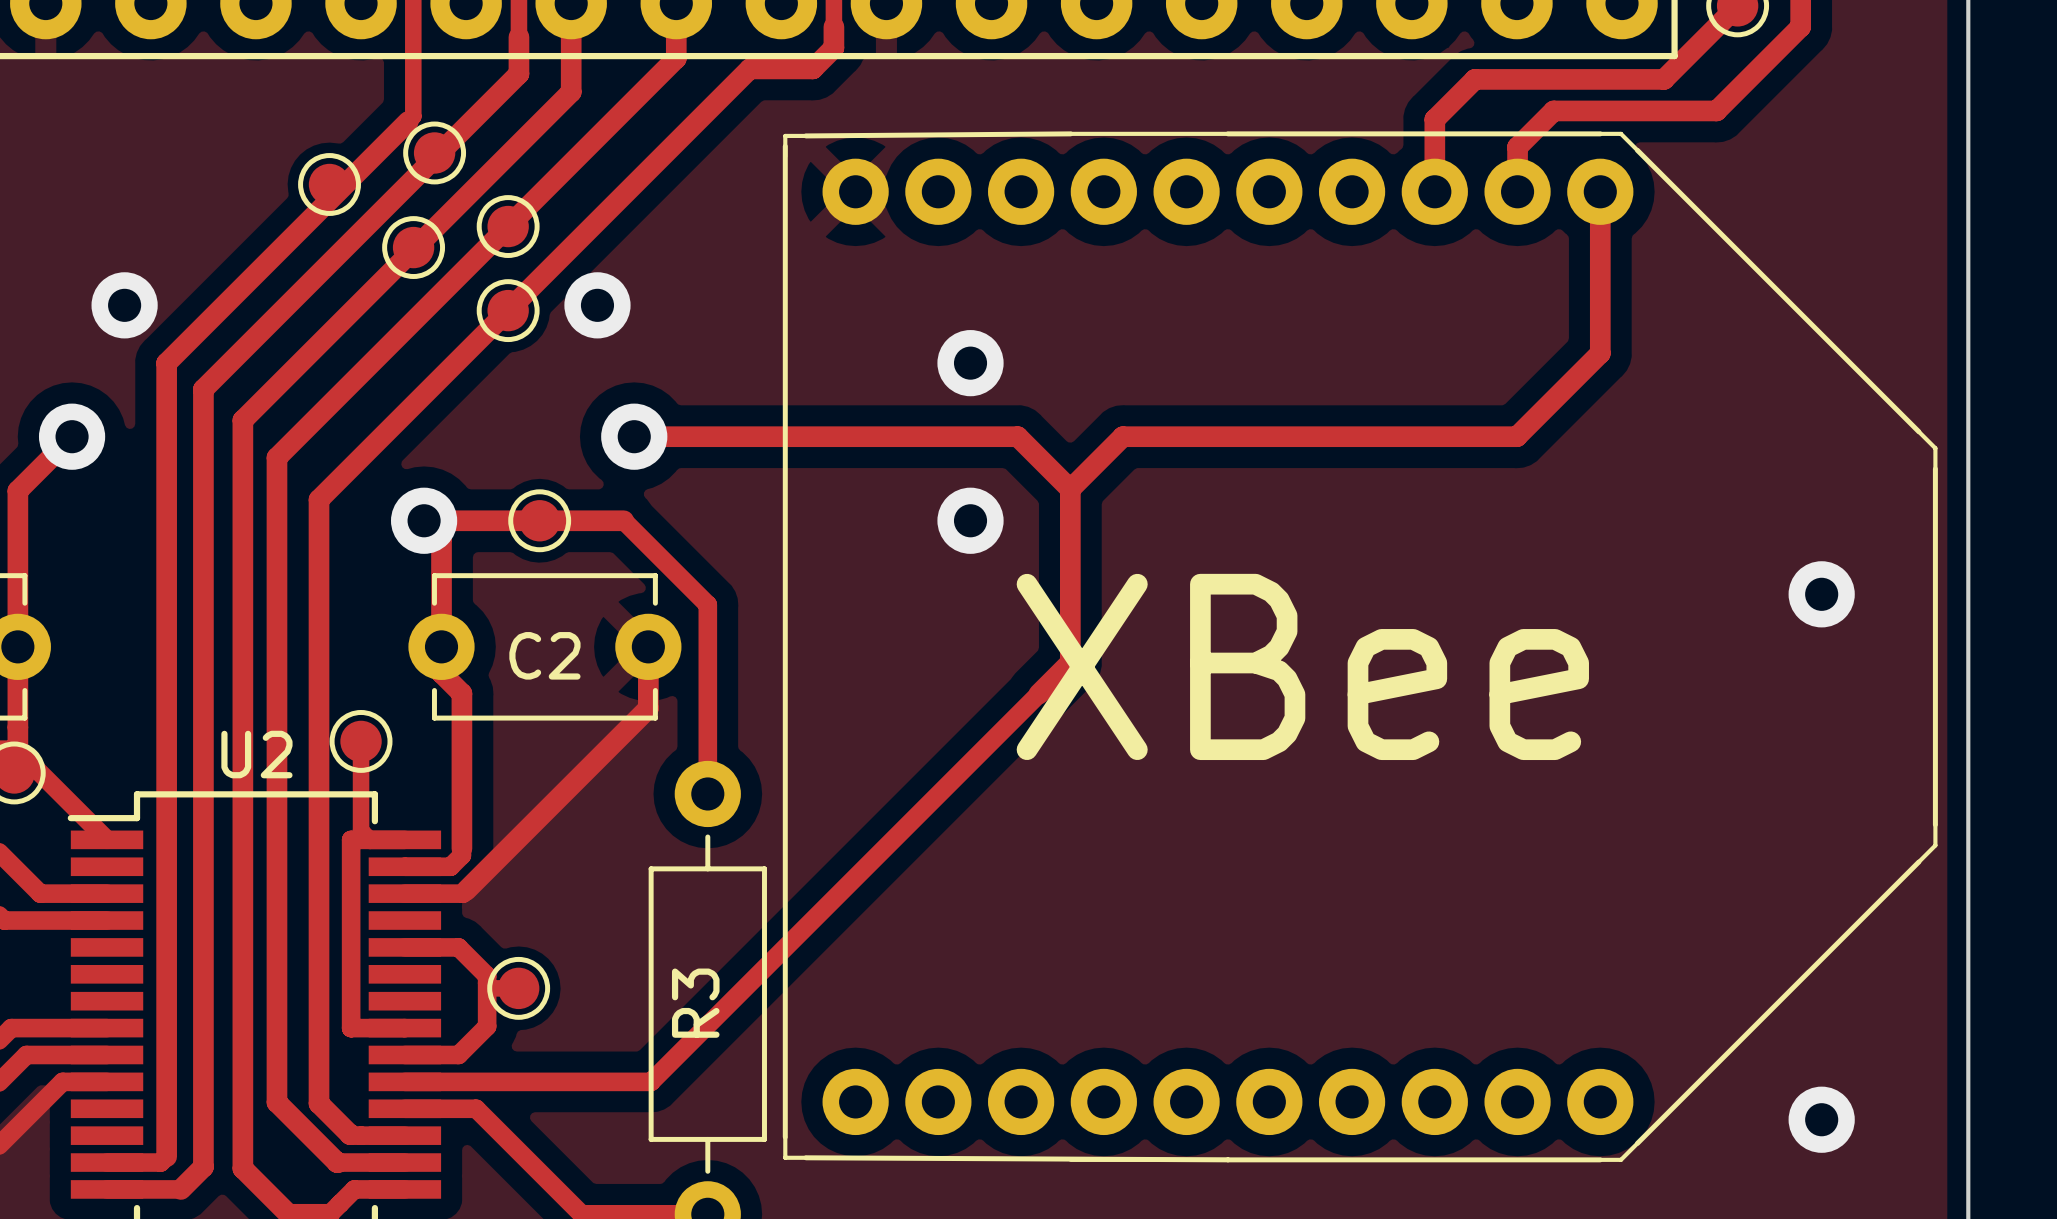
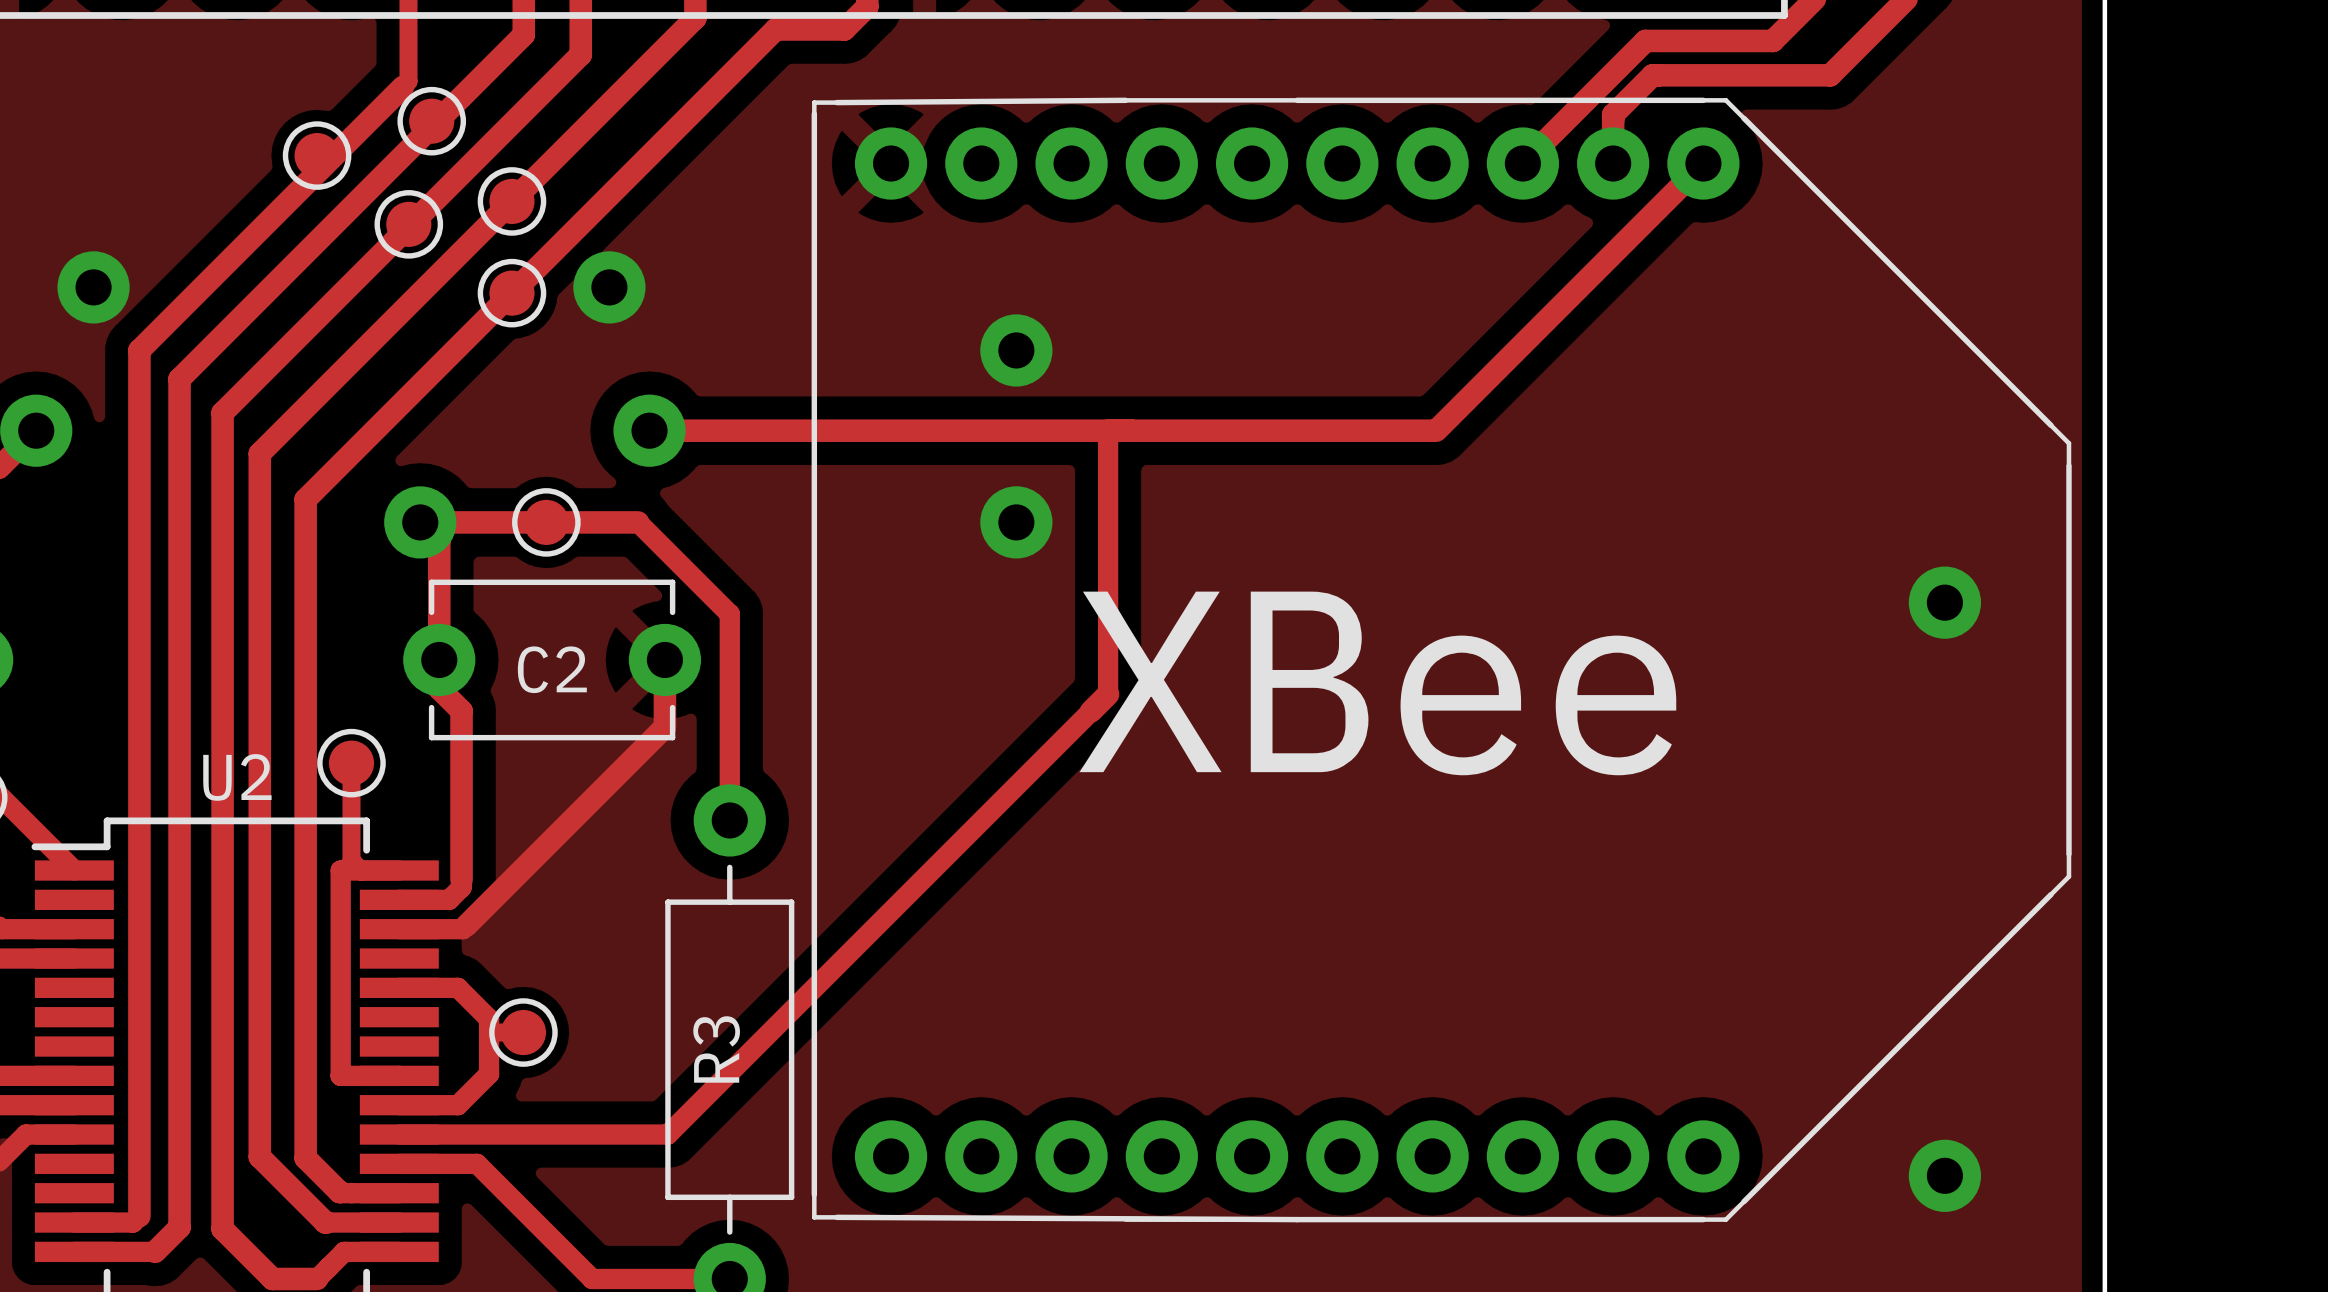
track: (1547, 79) (1474, 79) (1434, 119) (1434, 191) -> (1645, 40) (1522, 163)
track: (1600, 191) (1600, 353) (1516, 436) (1355, 436) -> (1703, 163) (1436, 430)
track: (1017, 436) (1070, 489) -> none
track: (1122, 436) (1070, 489) -> (1182, 430) (1067, 430)
track: (1070, 489) (1070, 662) (1054, 678) -> (1108, 430) (1108, 694)

